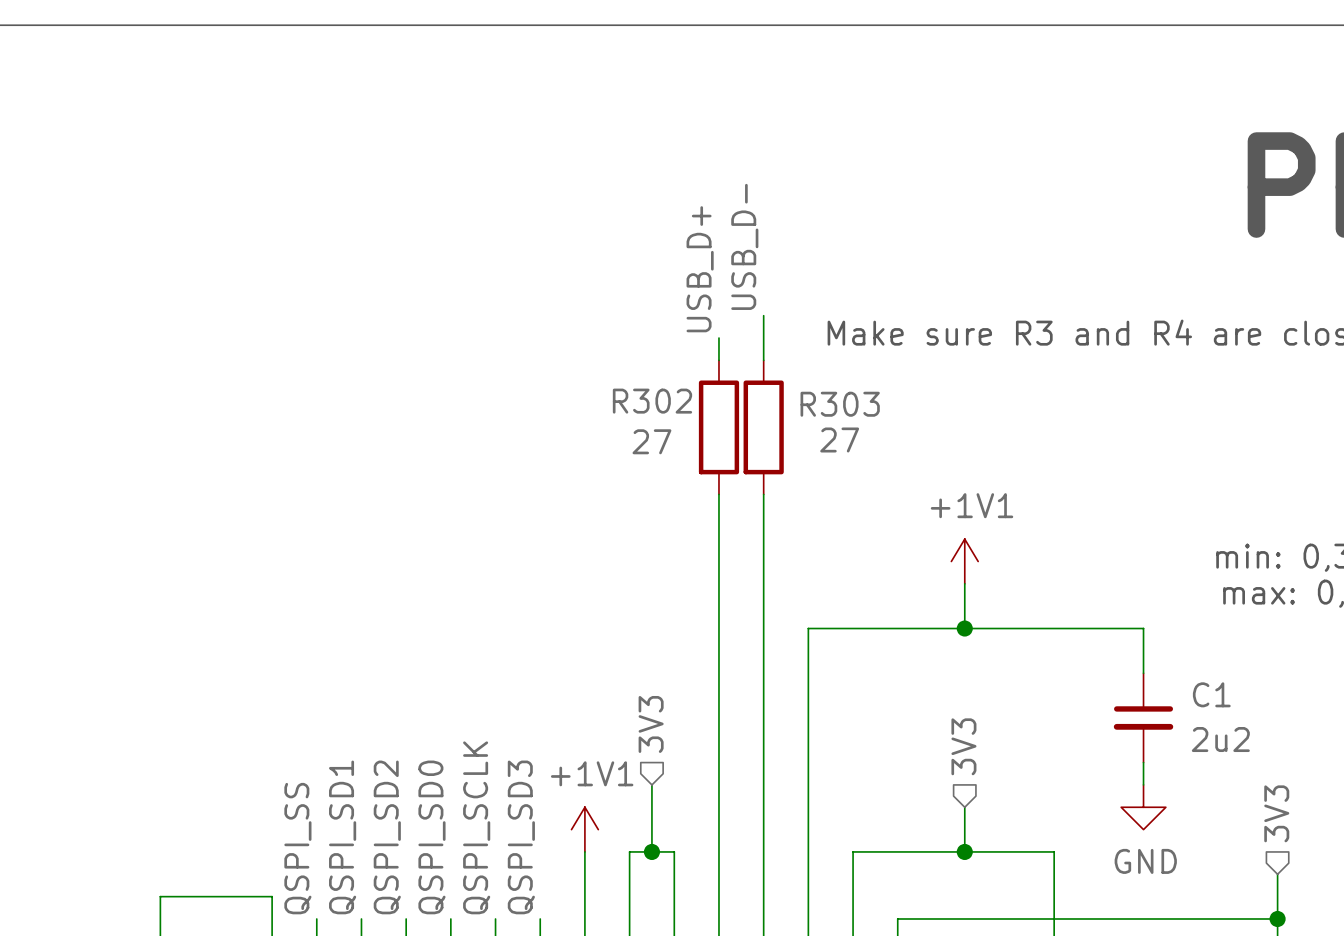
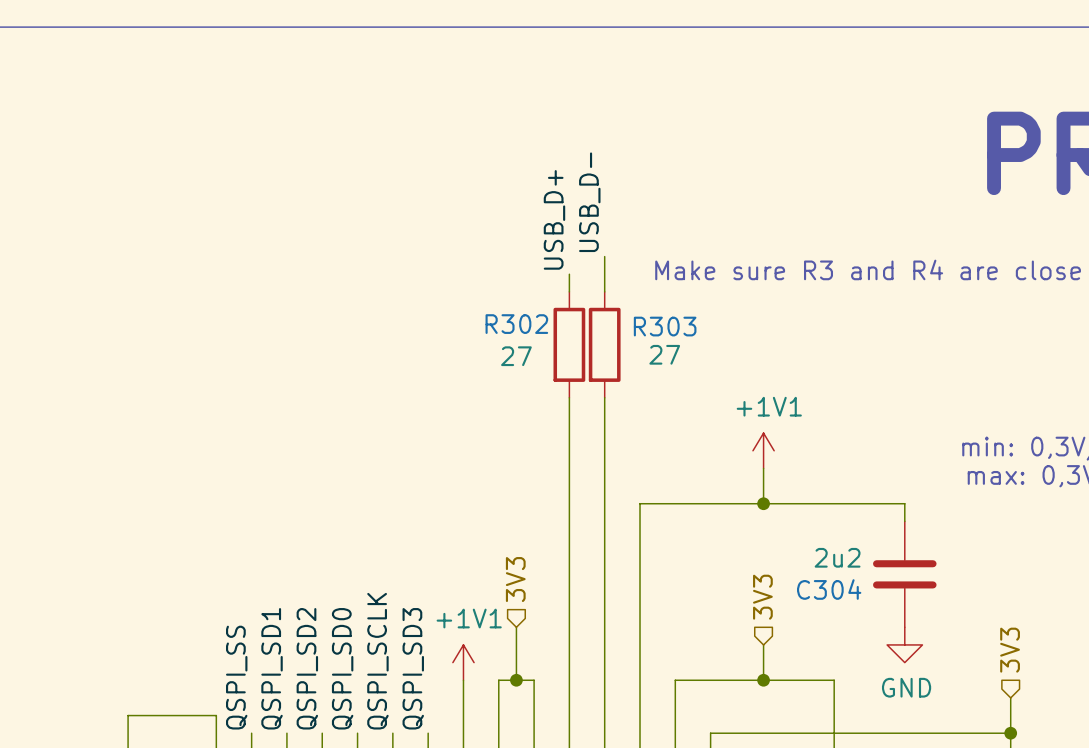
C1: 2u2 (1143, 717) -> none
C304: none -> 2u2 (904, 574)

